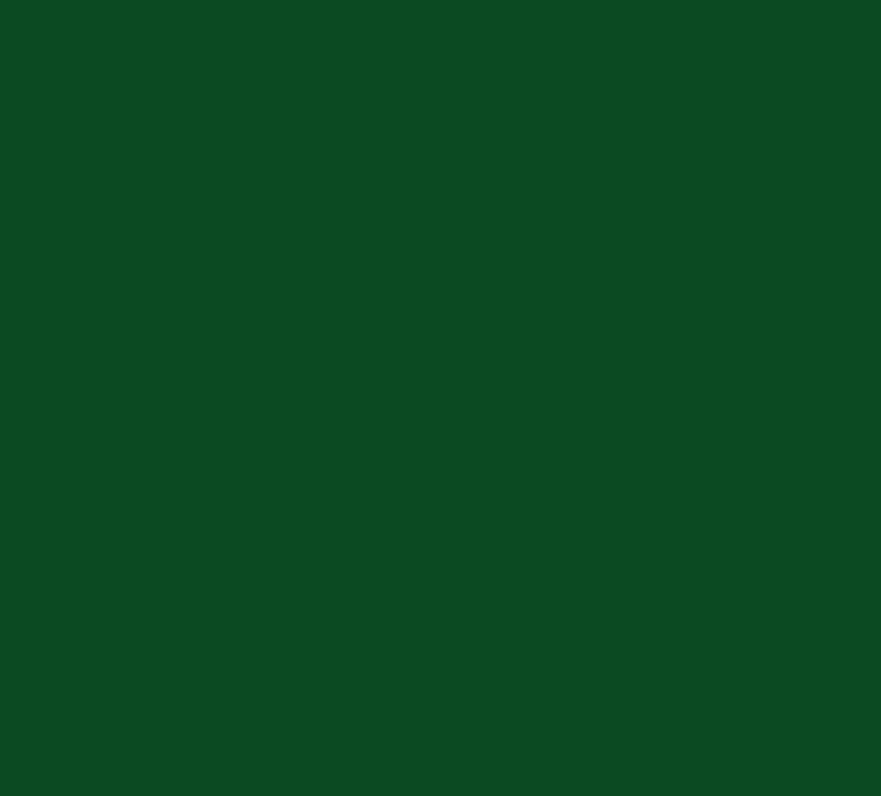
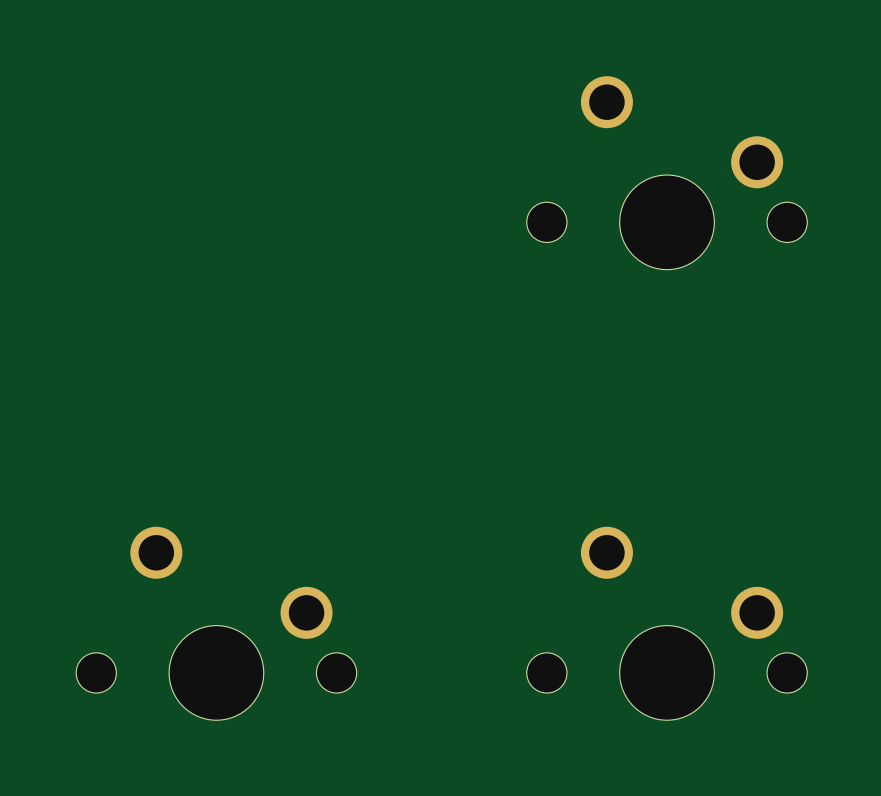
part: none -> (667, 172)
part: none -> (216, 623)
part: none -> (667, 623)

